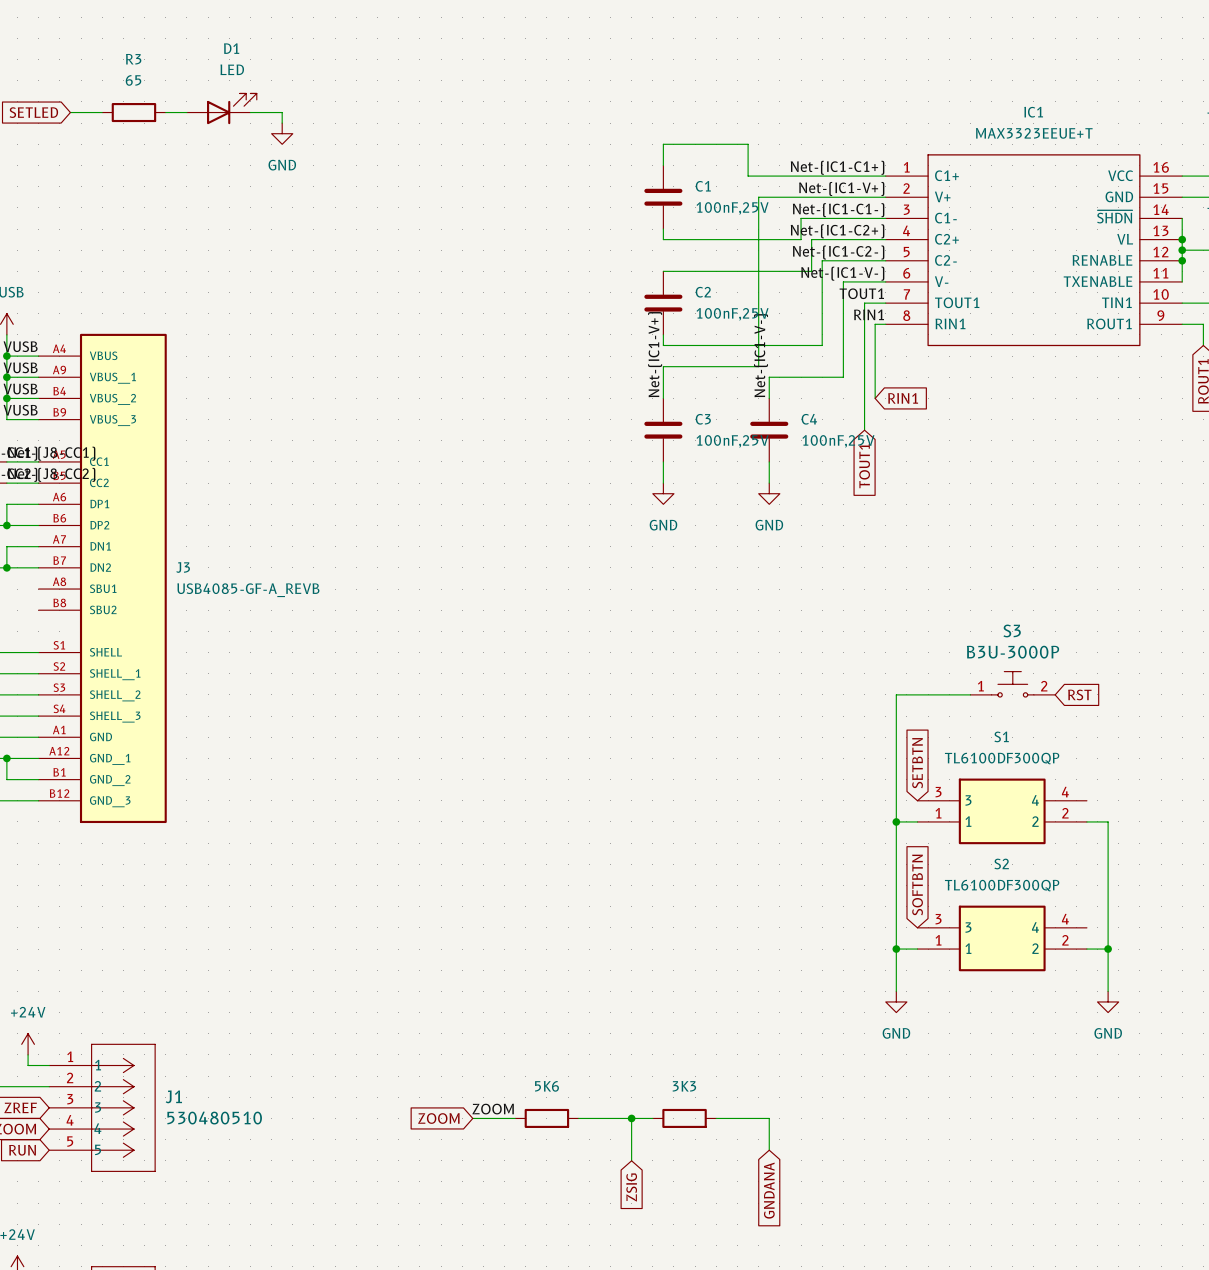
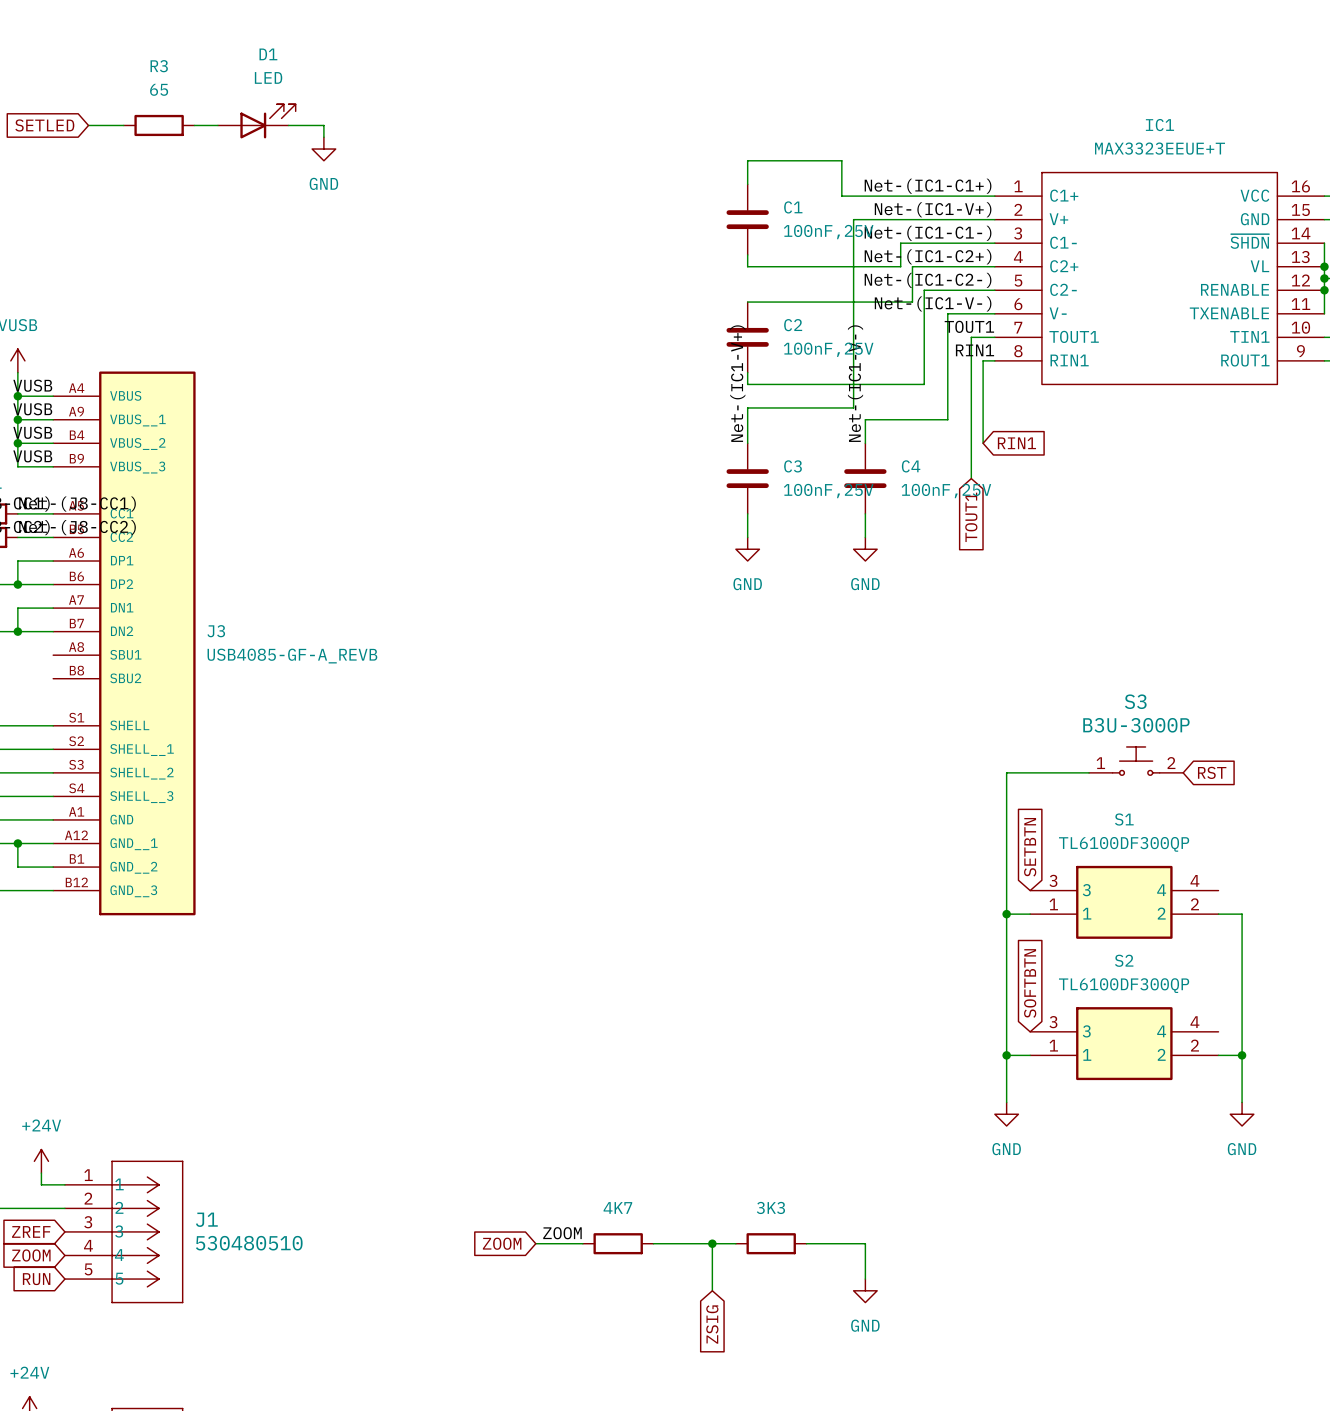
part value: 5K6 (547, 1086) -> 4K7 (617, 1207)
power symbol: none -> GND (865, 1290)
global label: GNDANA (769, 1190) -> none

